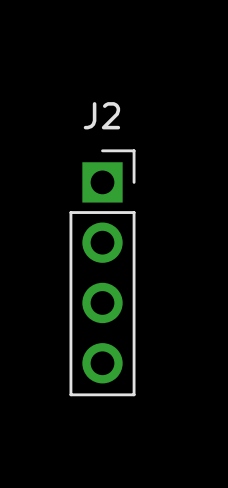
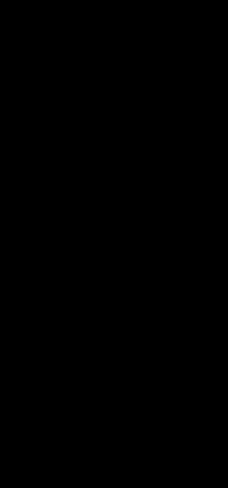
J2: (102, 272) -> none

